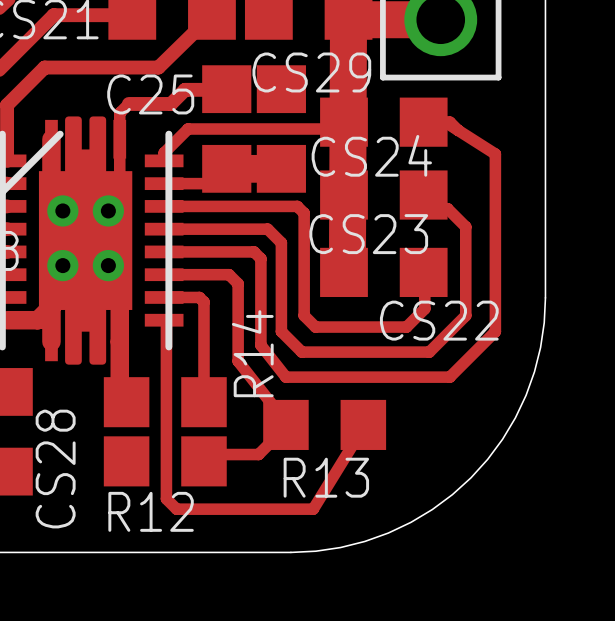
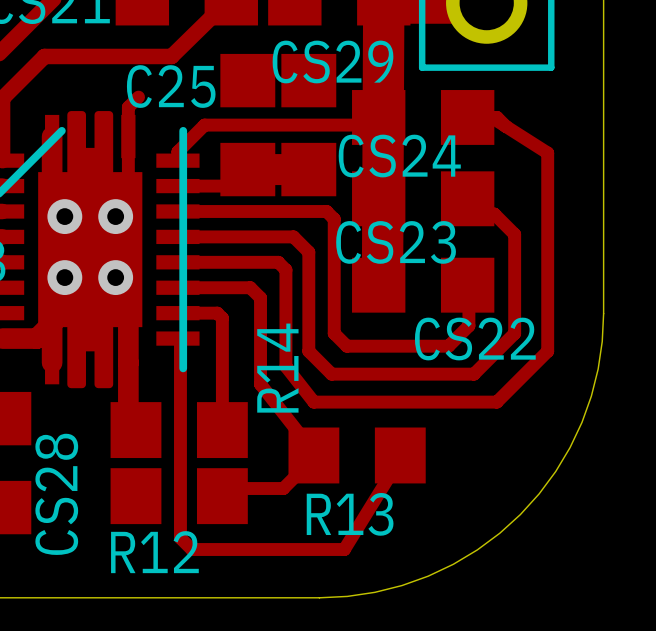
track: (226, 89) (185, 89) (170, 103) (128, 103) -> none

